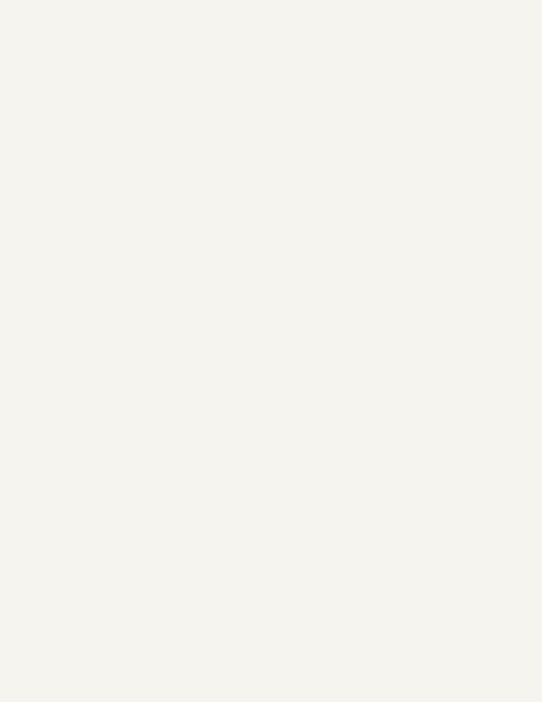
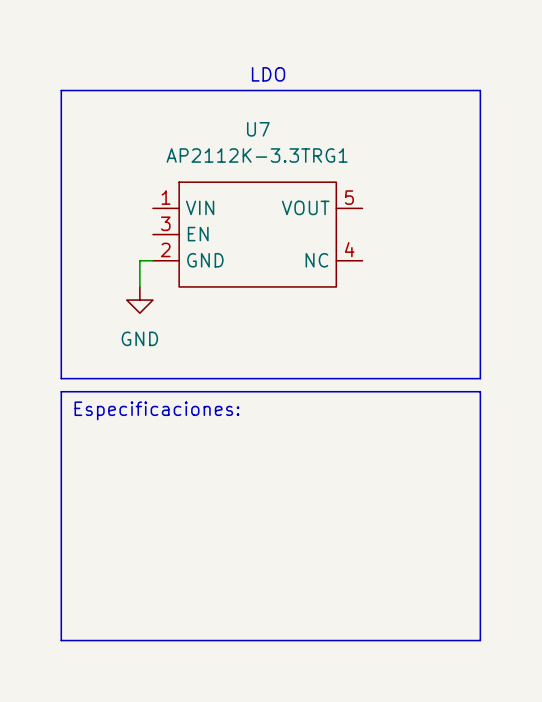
text: none -> LDO (268, 74)
line: none -> (61, 90) (480, 90) (480, 378) (61, 378) (61, 90)
U7: none -> AP2112K-3.3TRG1 (257, 234)
wire: none -> (152, 260) (139, 260) (139, 286)
power symbol: none -> GND (139, 300)
line: none -> (61, 391) (61, 640) (480, 640) (480, 391) (61, 391)
text: none -> Especificaciones: (156, 410)

